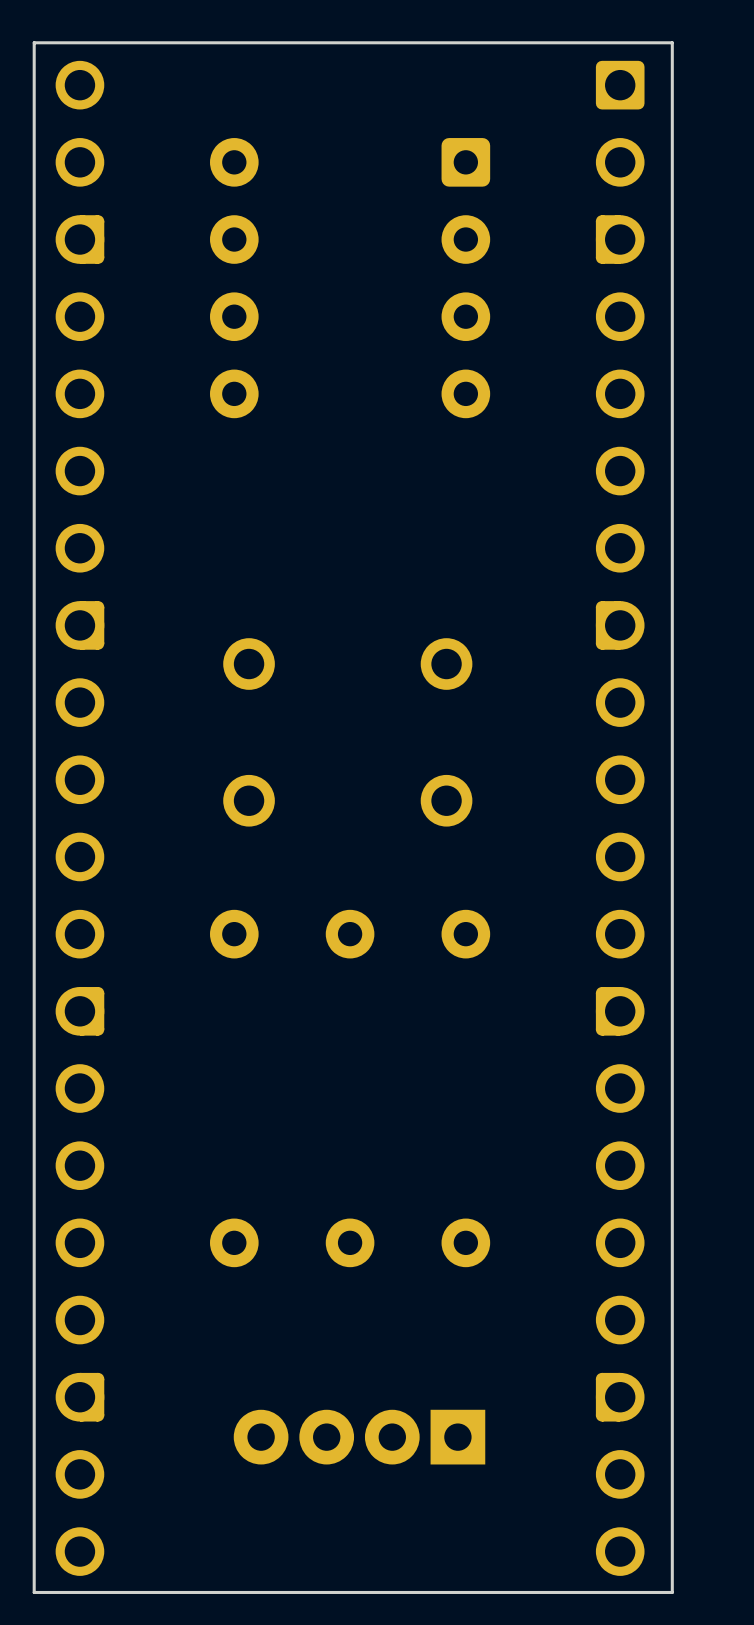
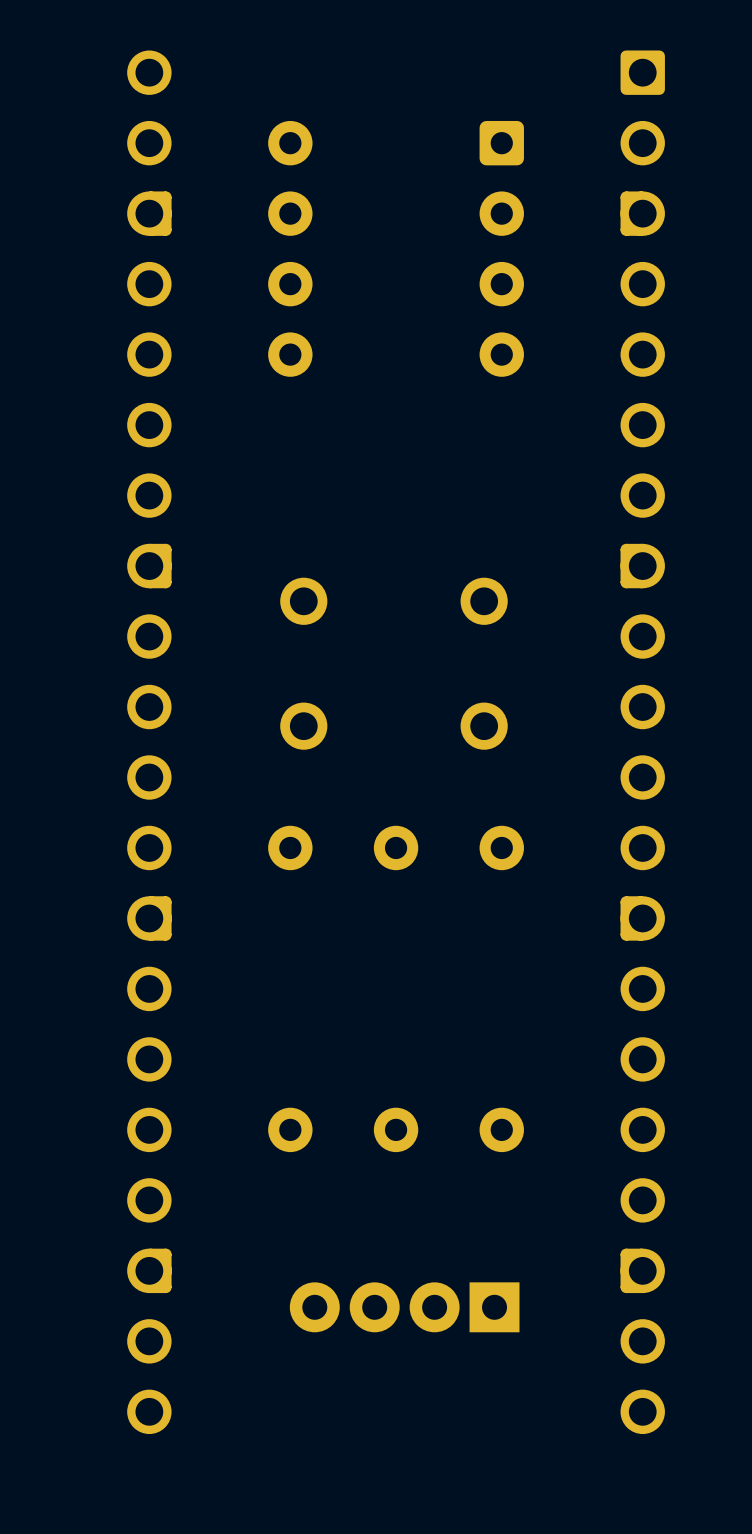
board edge: (672, 42) (34, 42) (34, 1592) (672, 1592) (672, 42) -> none

